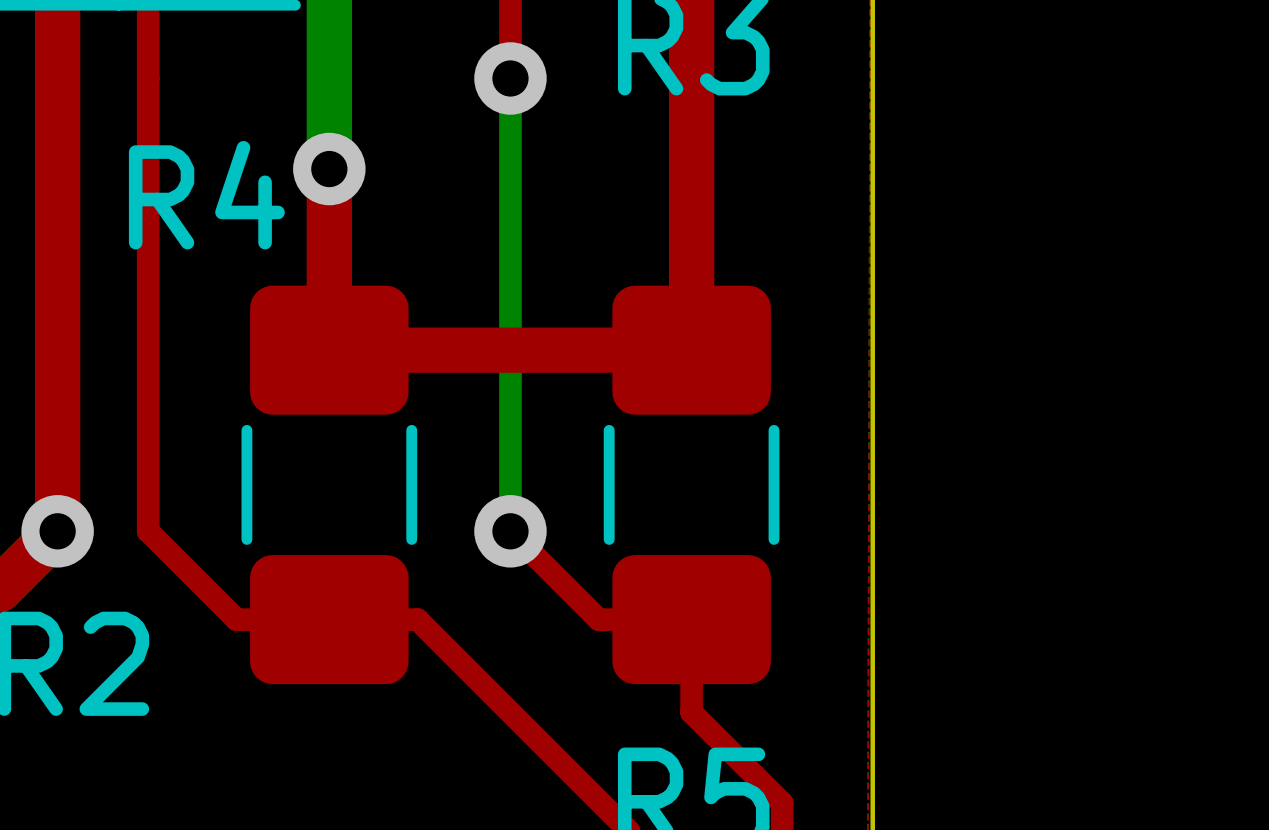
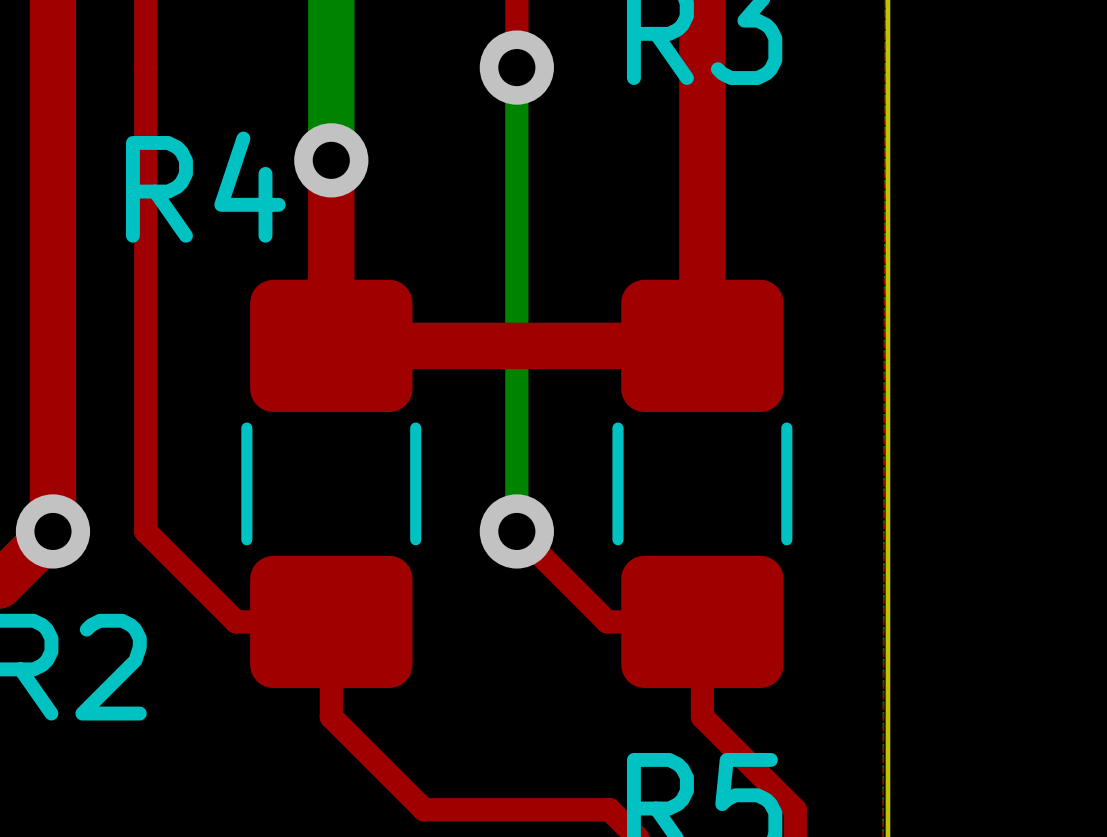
top track: (329, 619) (417, 619) (601, 803) -> (331, 621) (331, 717) (424, 809) (609, 809)

